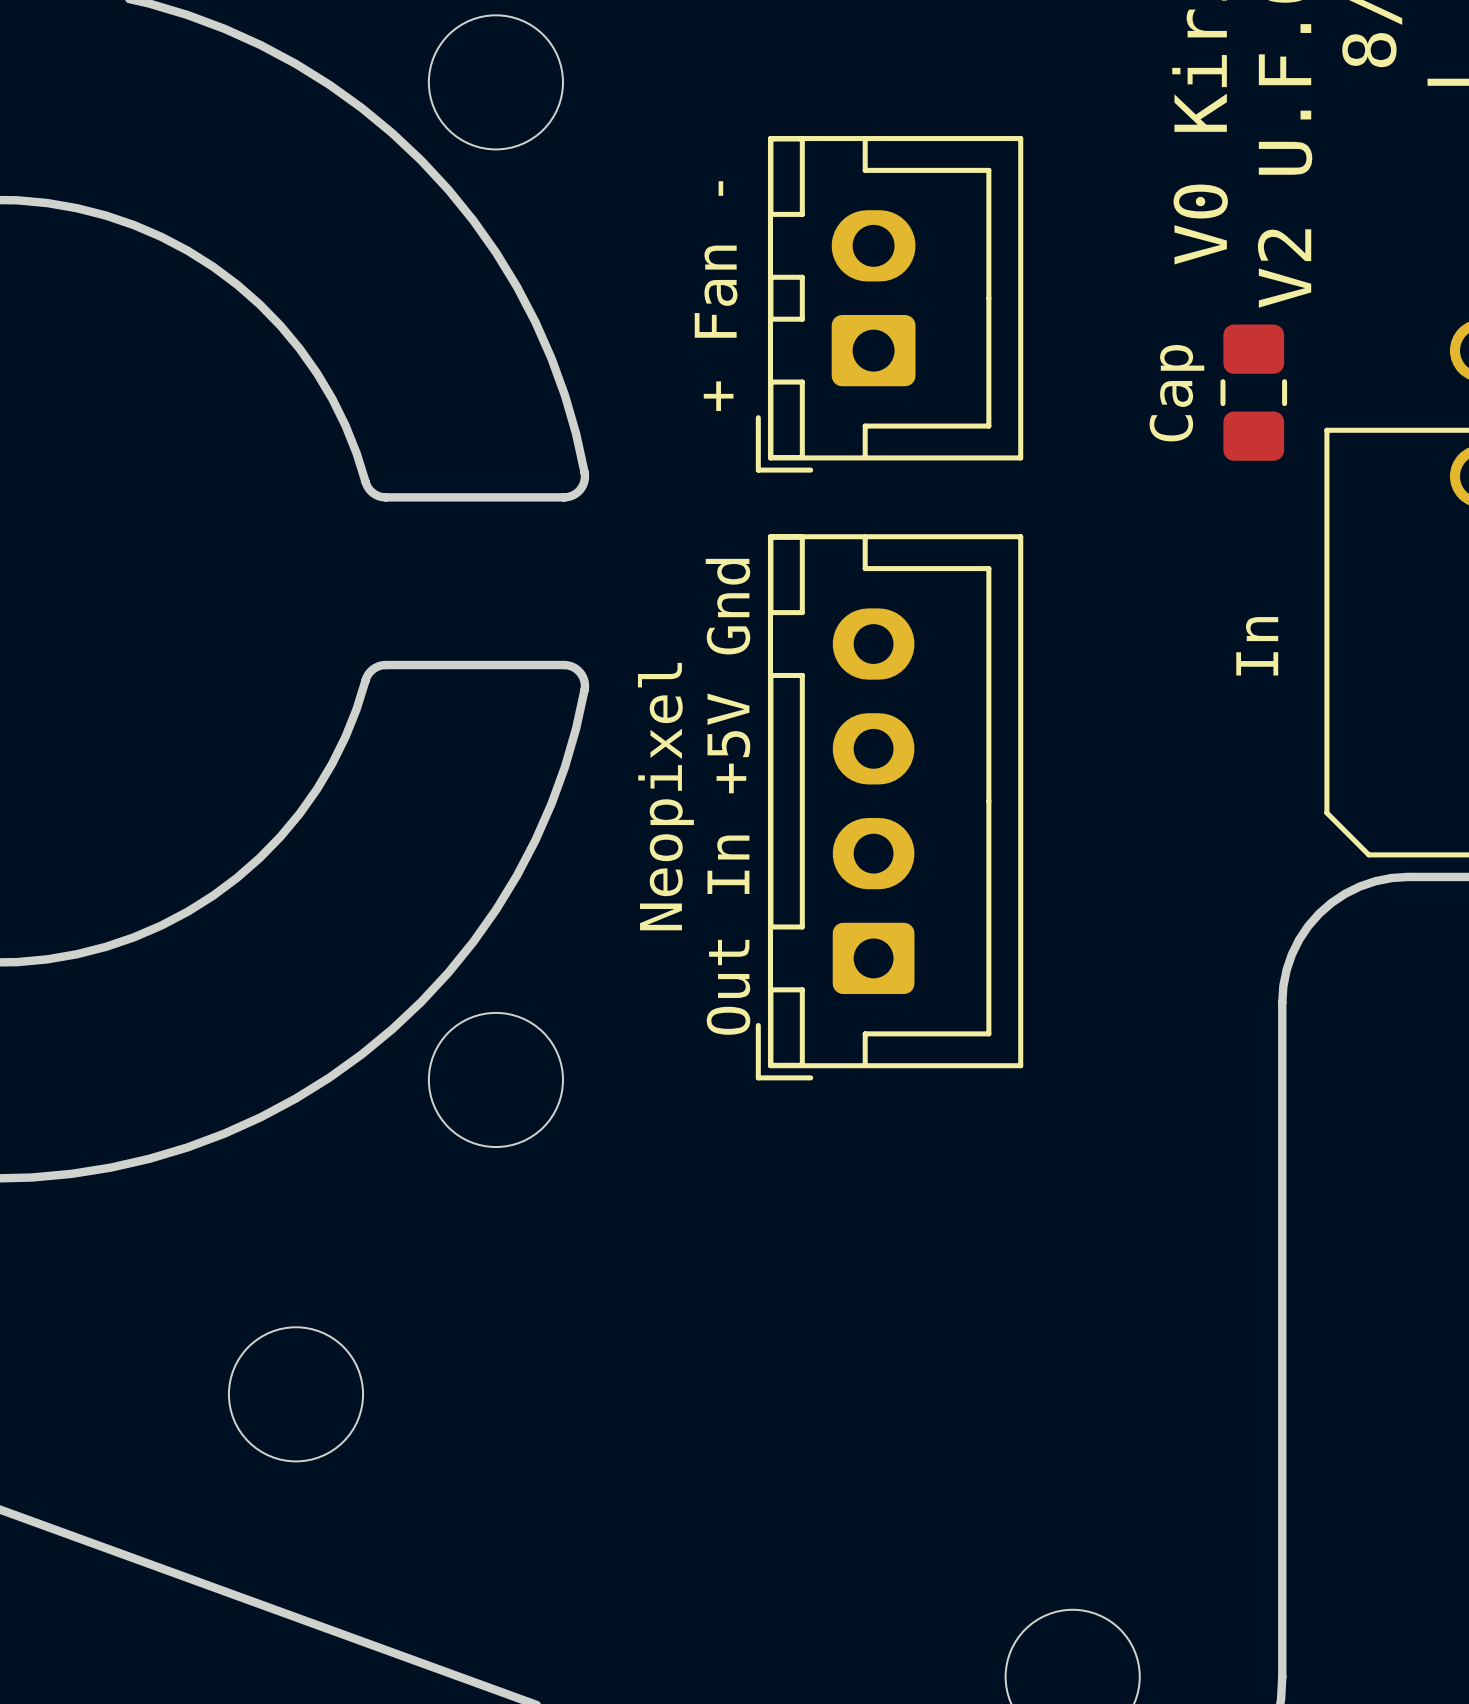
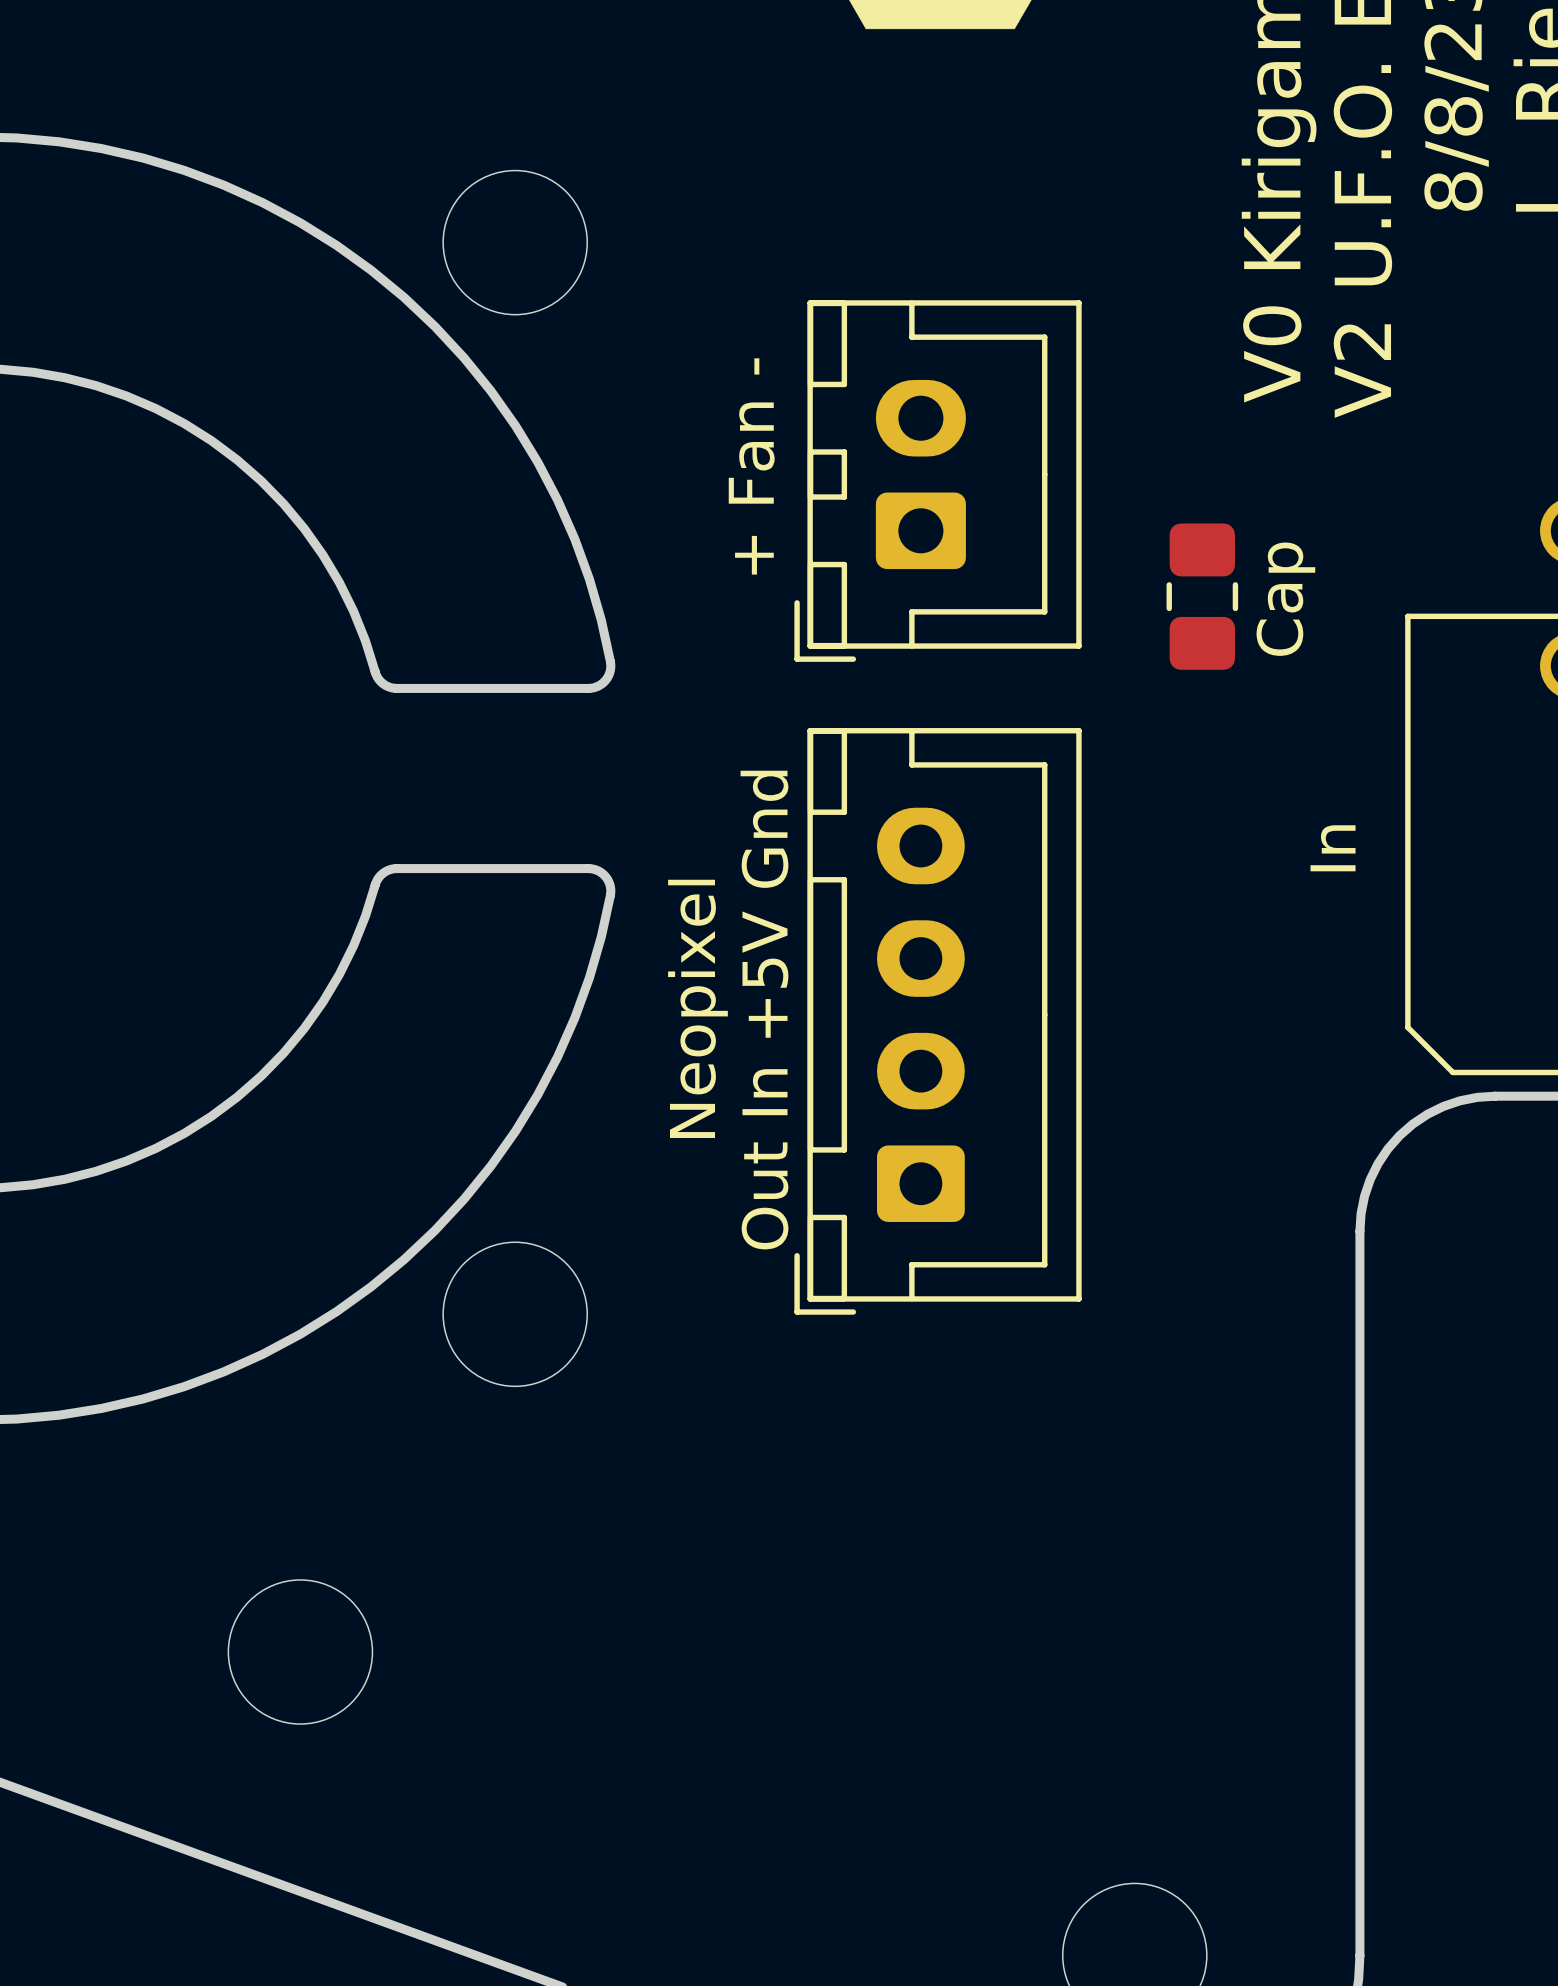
part position: (1253, 392) -> (1202, 596)
text position: Cap (1176, 393) -> Cap (1285, 599)

